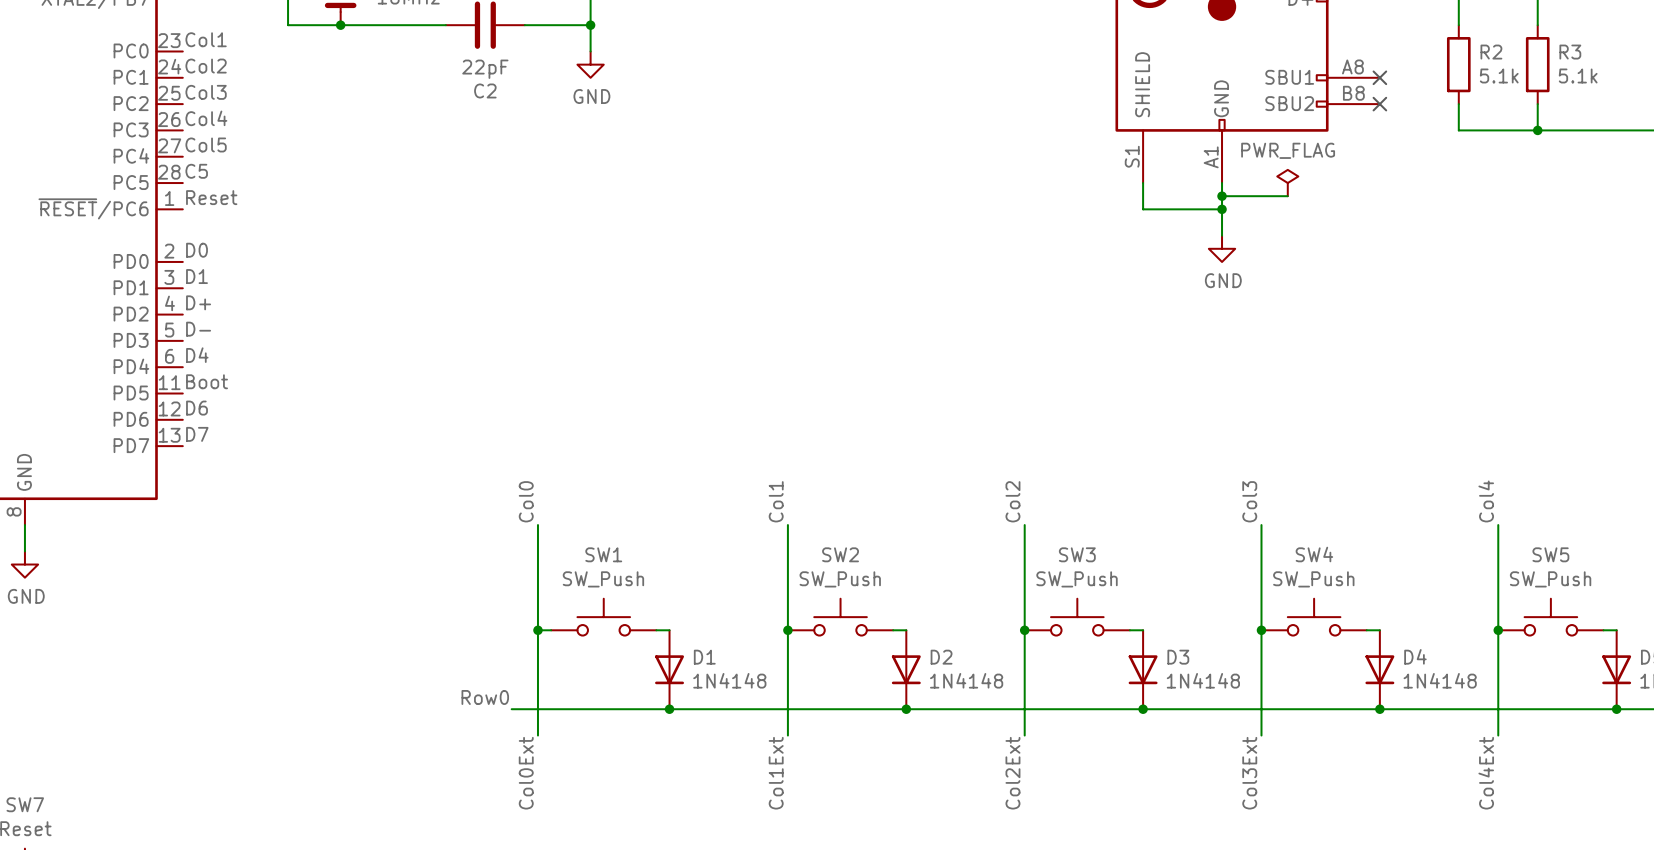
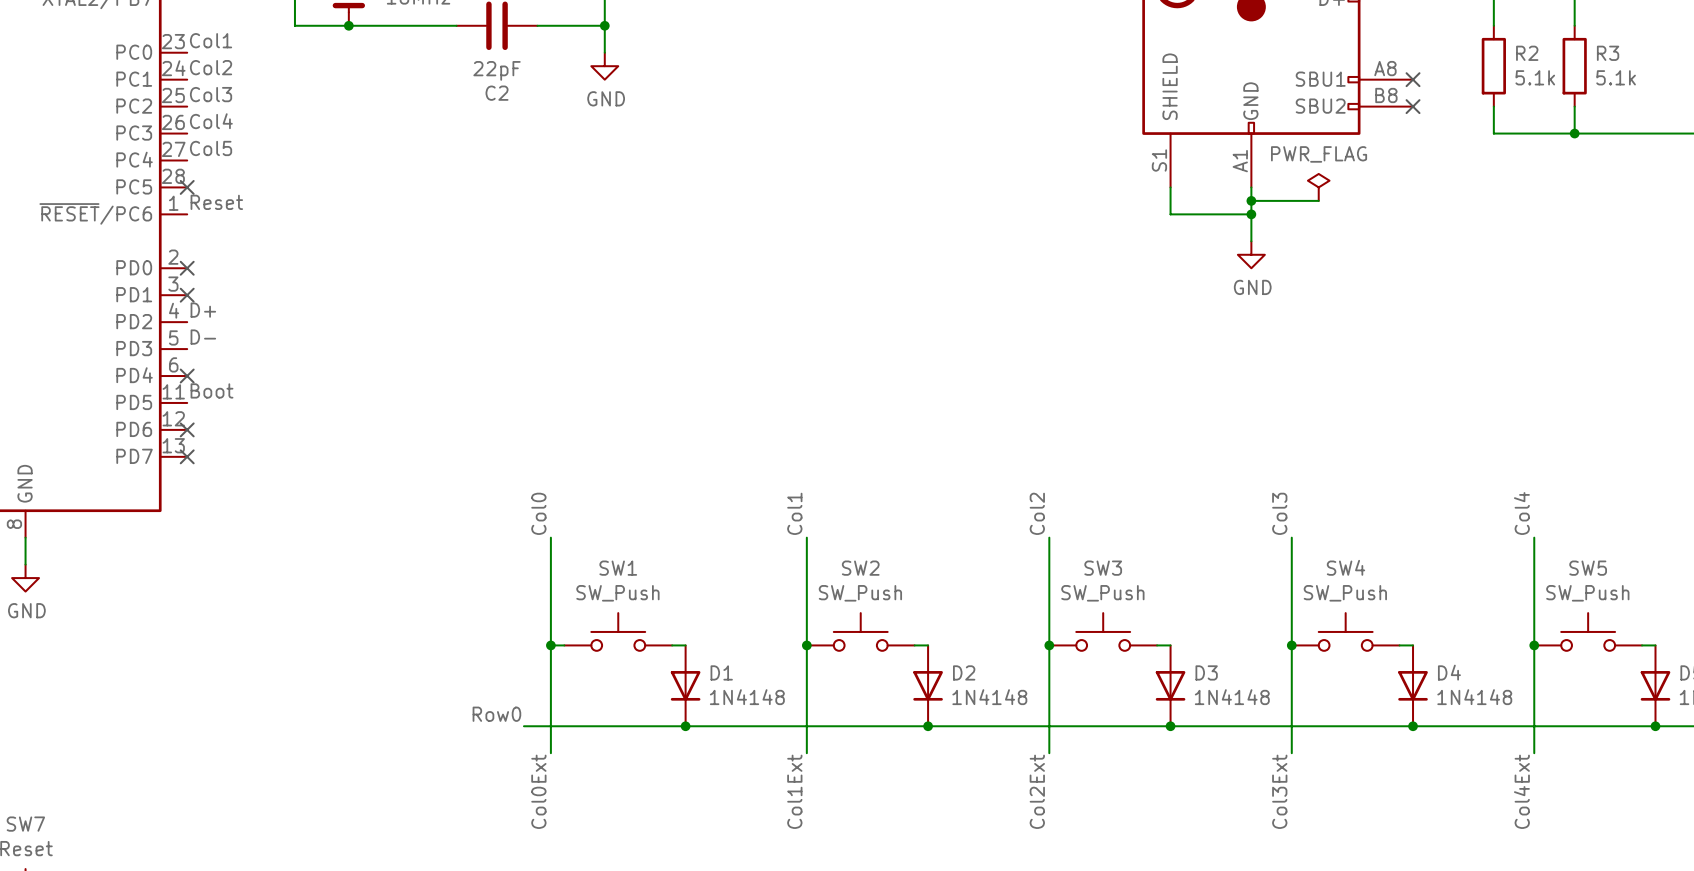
label: C5 (196, 171) -> none
no-connect mark: none -> (187, 187)
label: D0 (197, 250) -> none
no-connect mark: none -> (187, 268)
label: D1 (197, 276) -> none
no-connect mark: none -> (187, 295)
label: D4 (197, 355) -> none
no-connect mark: none -> (187, 376)
label: D6 (197, 408) -> none
no-connect mark: none -> (187, 429)
label: D7 (197, 434) -> none
no-connect mark: none -> (187, 456)

